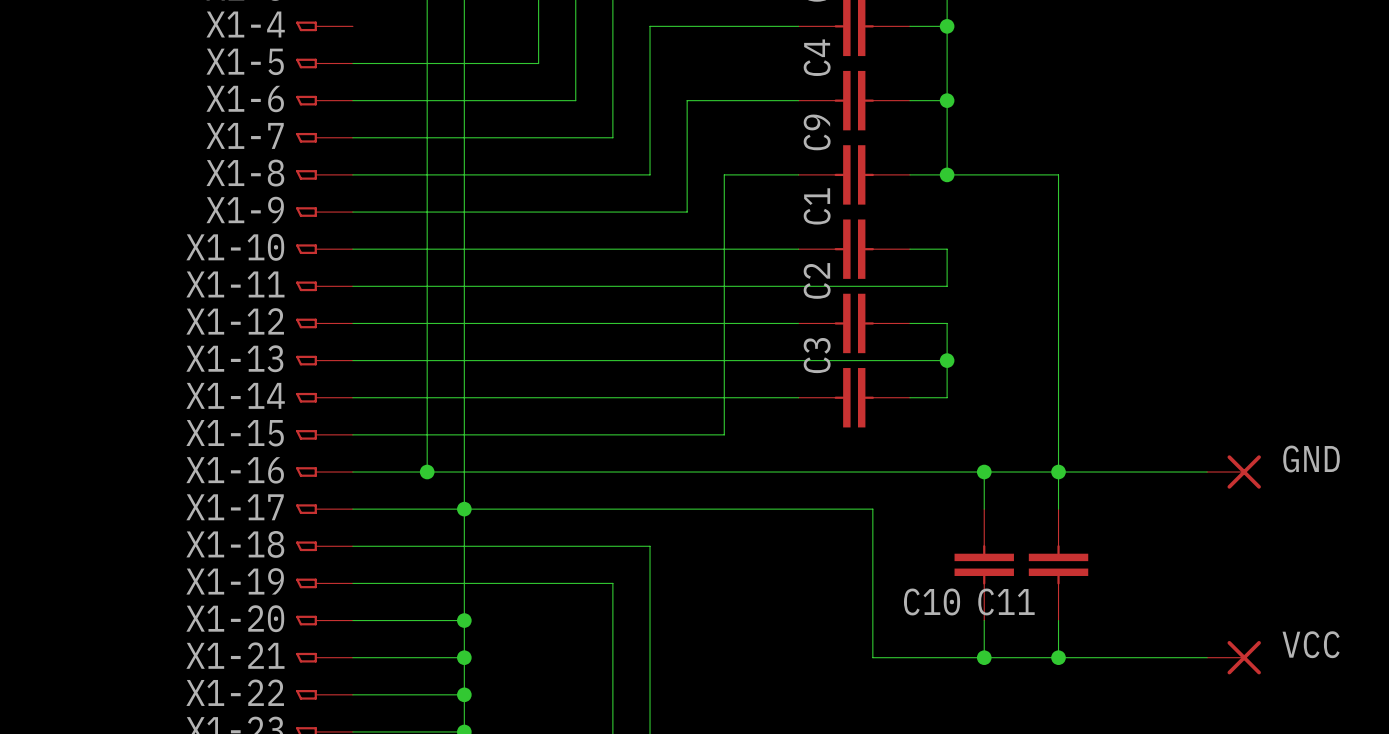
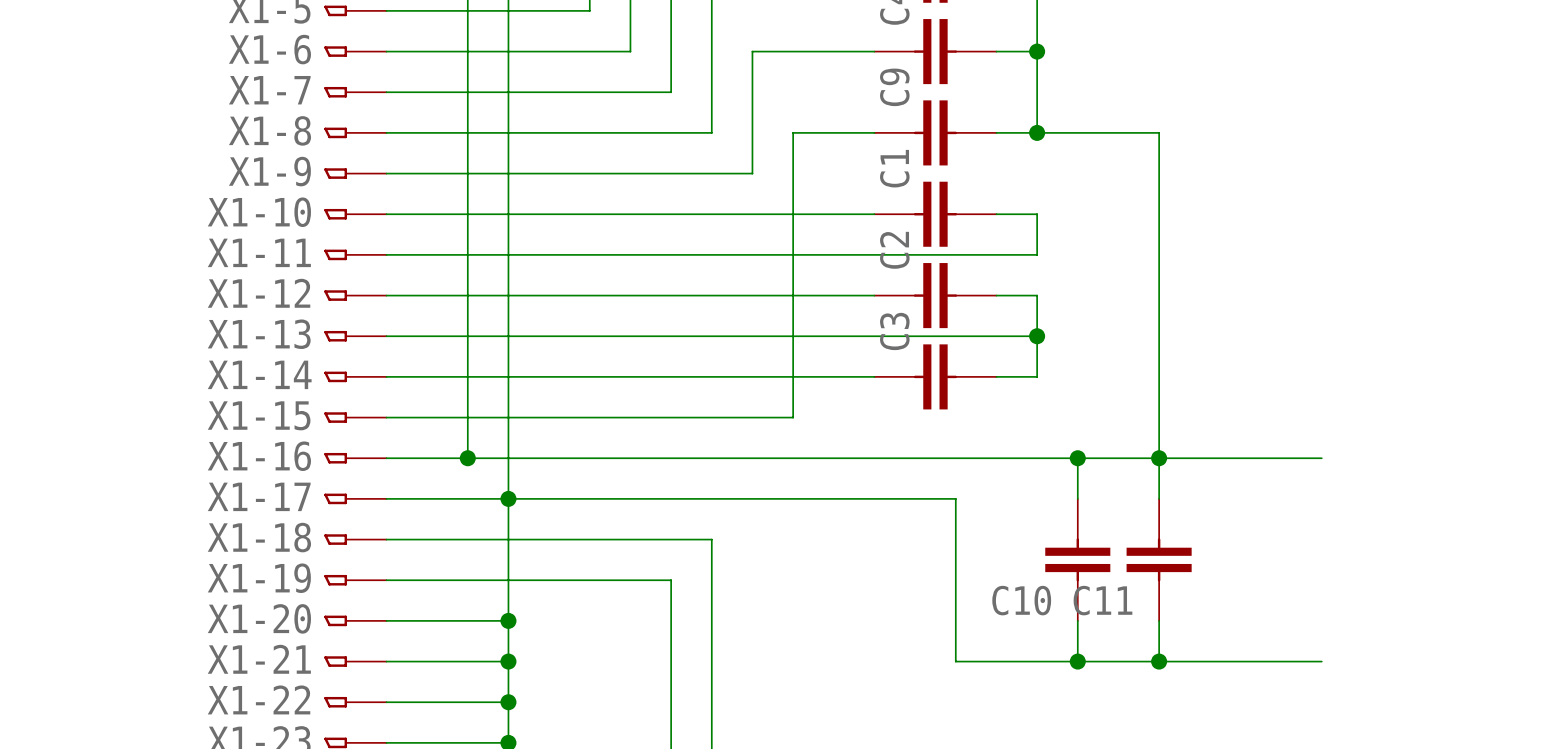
label: GND (1311, 459) -> none
part: (1233, 472) -> none
label: VCC (1311, 644) -> none
part: (1233, 657) -> none

